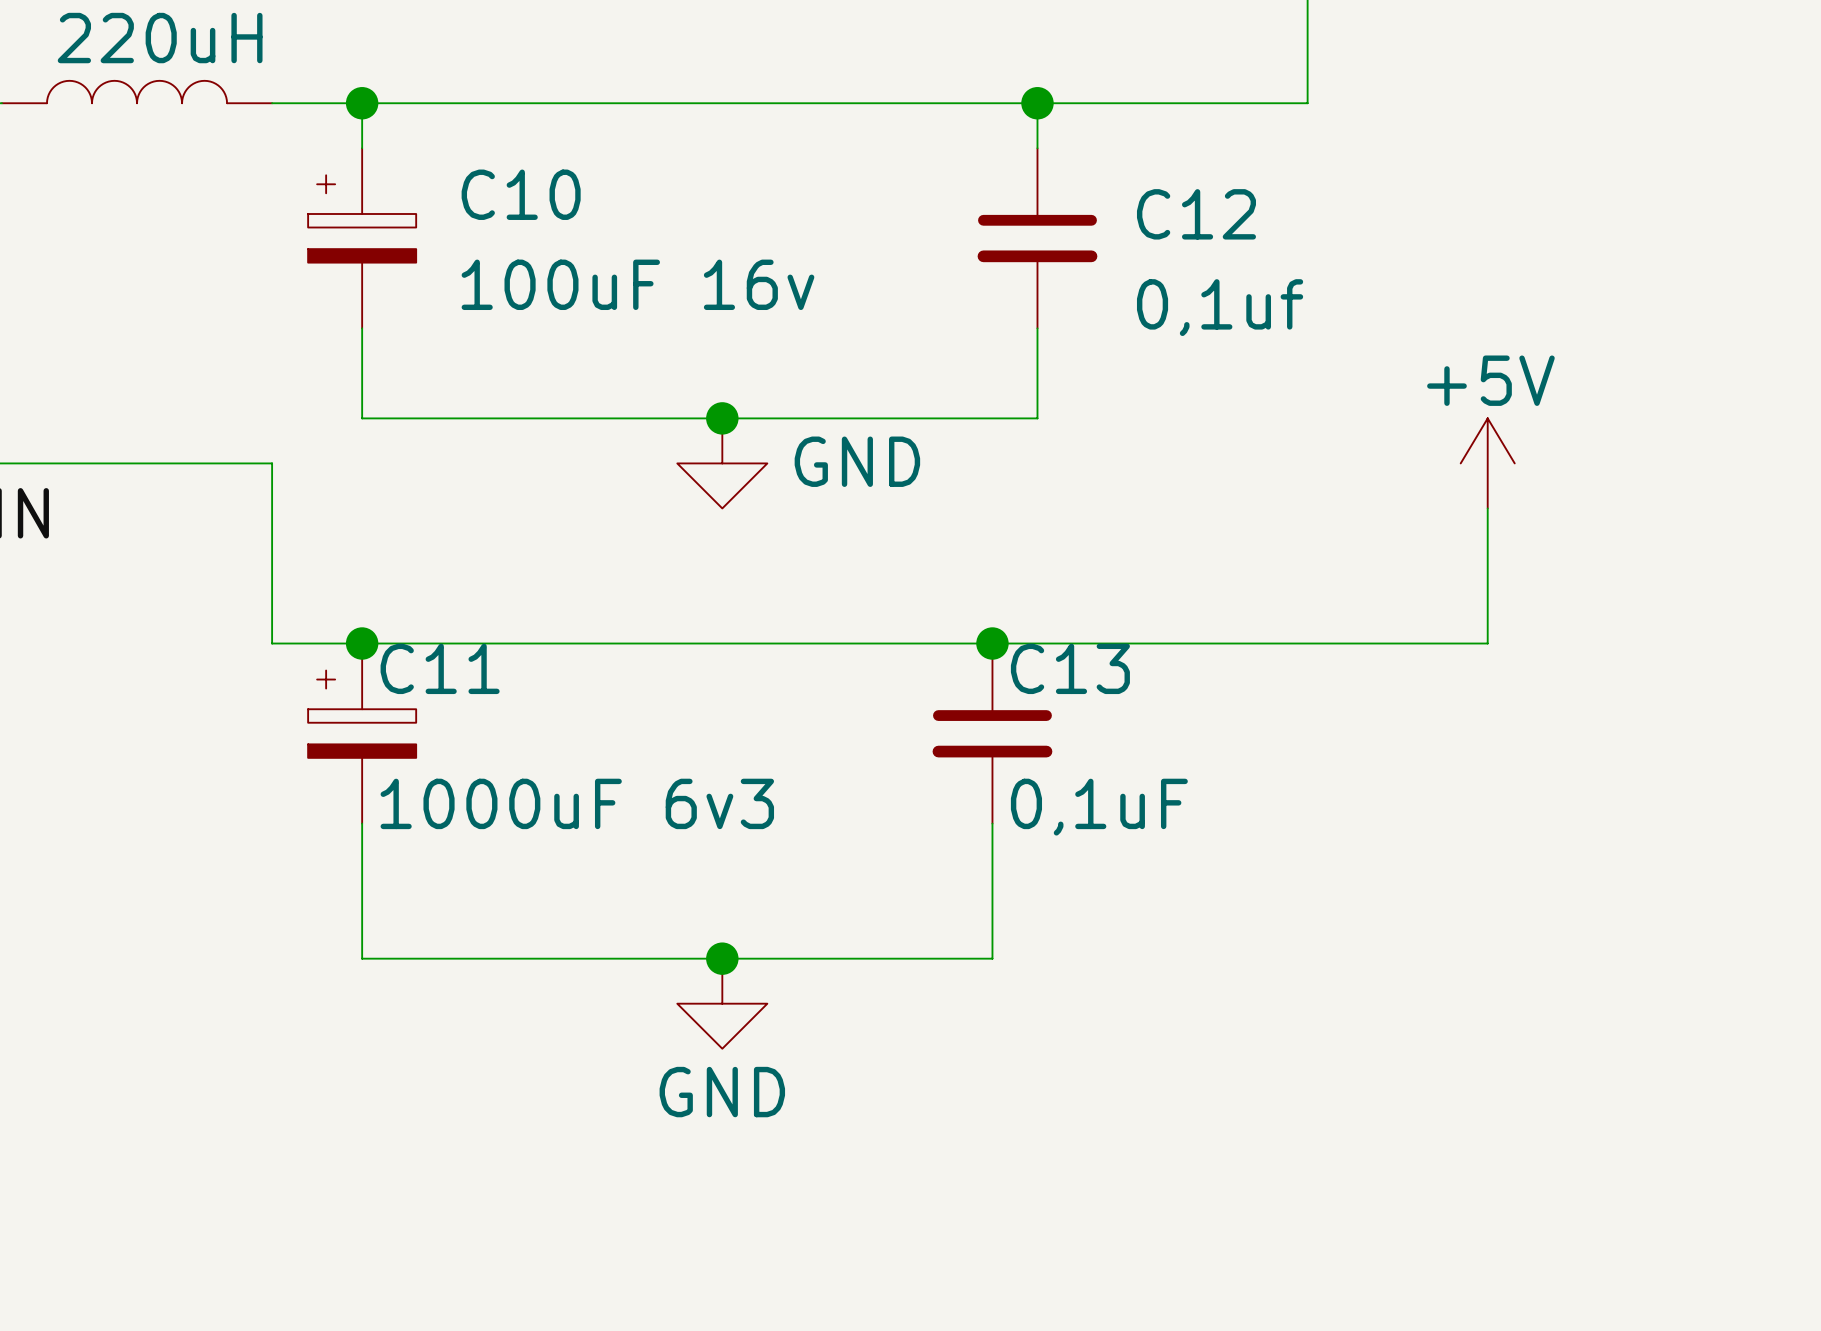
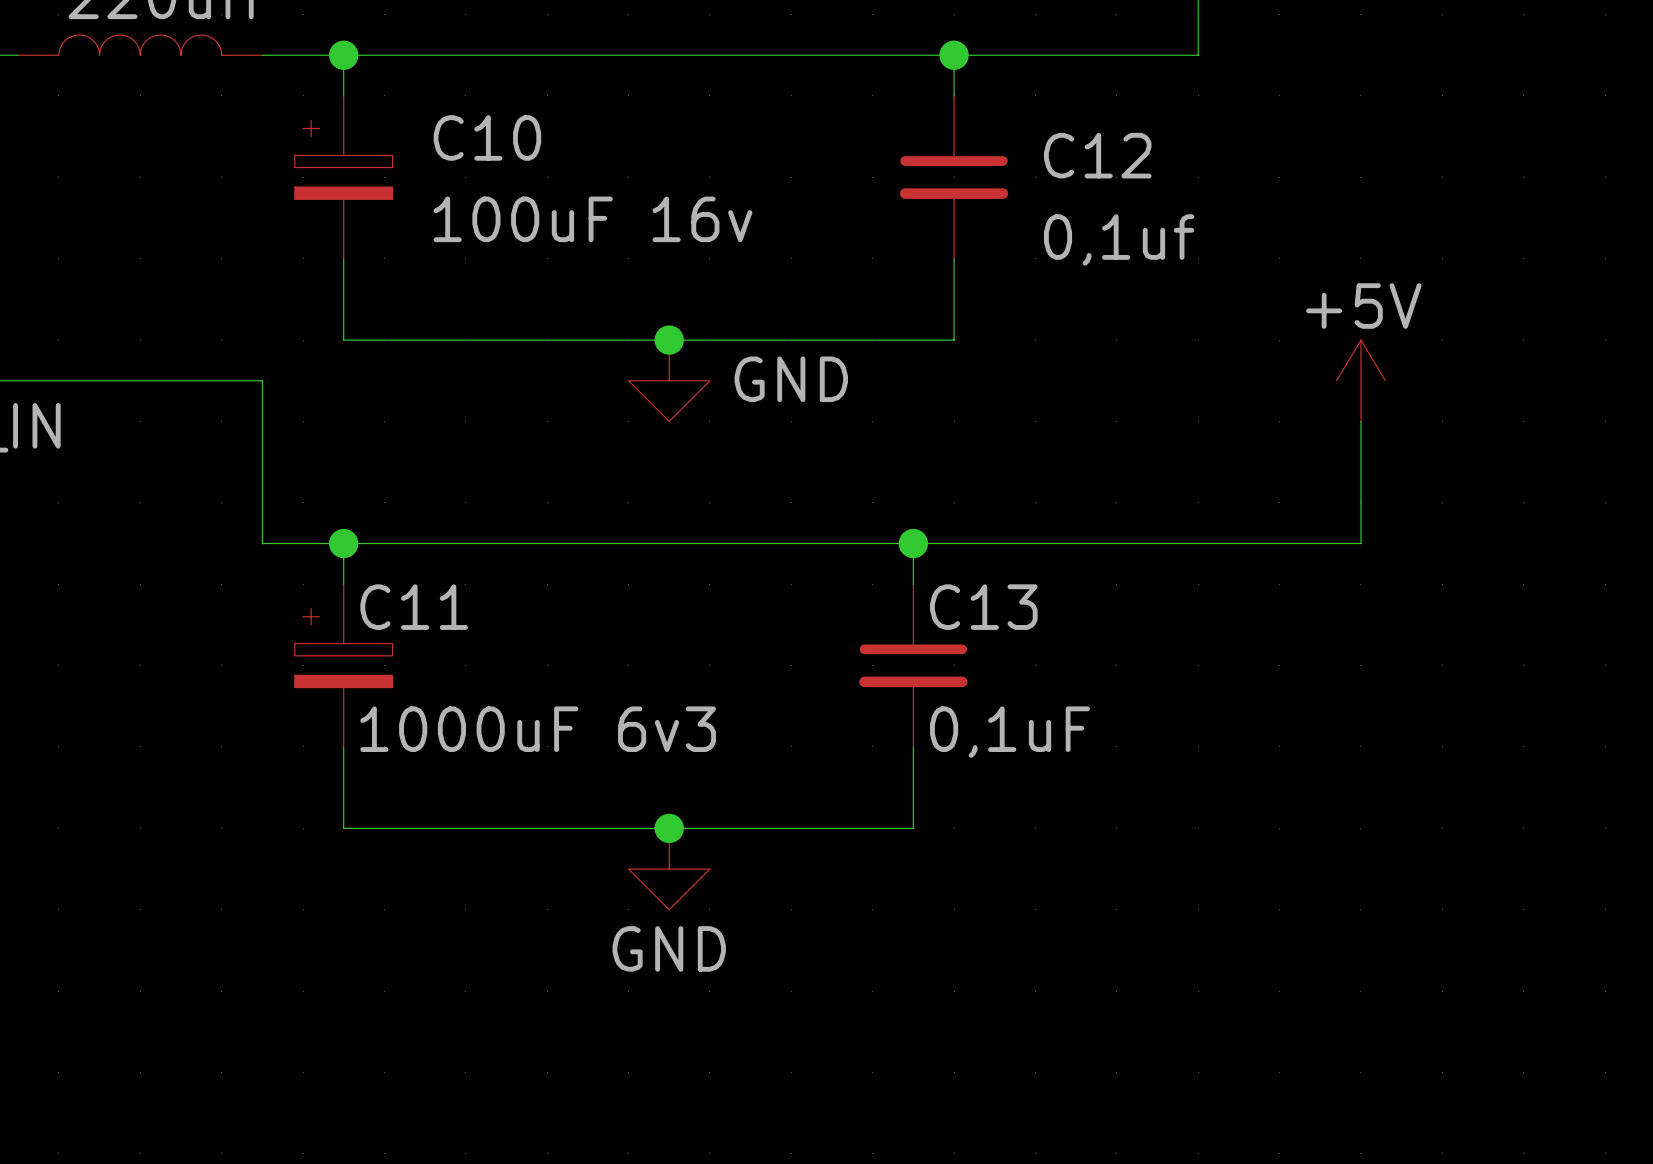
C11 position: (362, 733) -> (343, 665)
C13 position: (992, 733) -> (913, 665)

